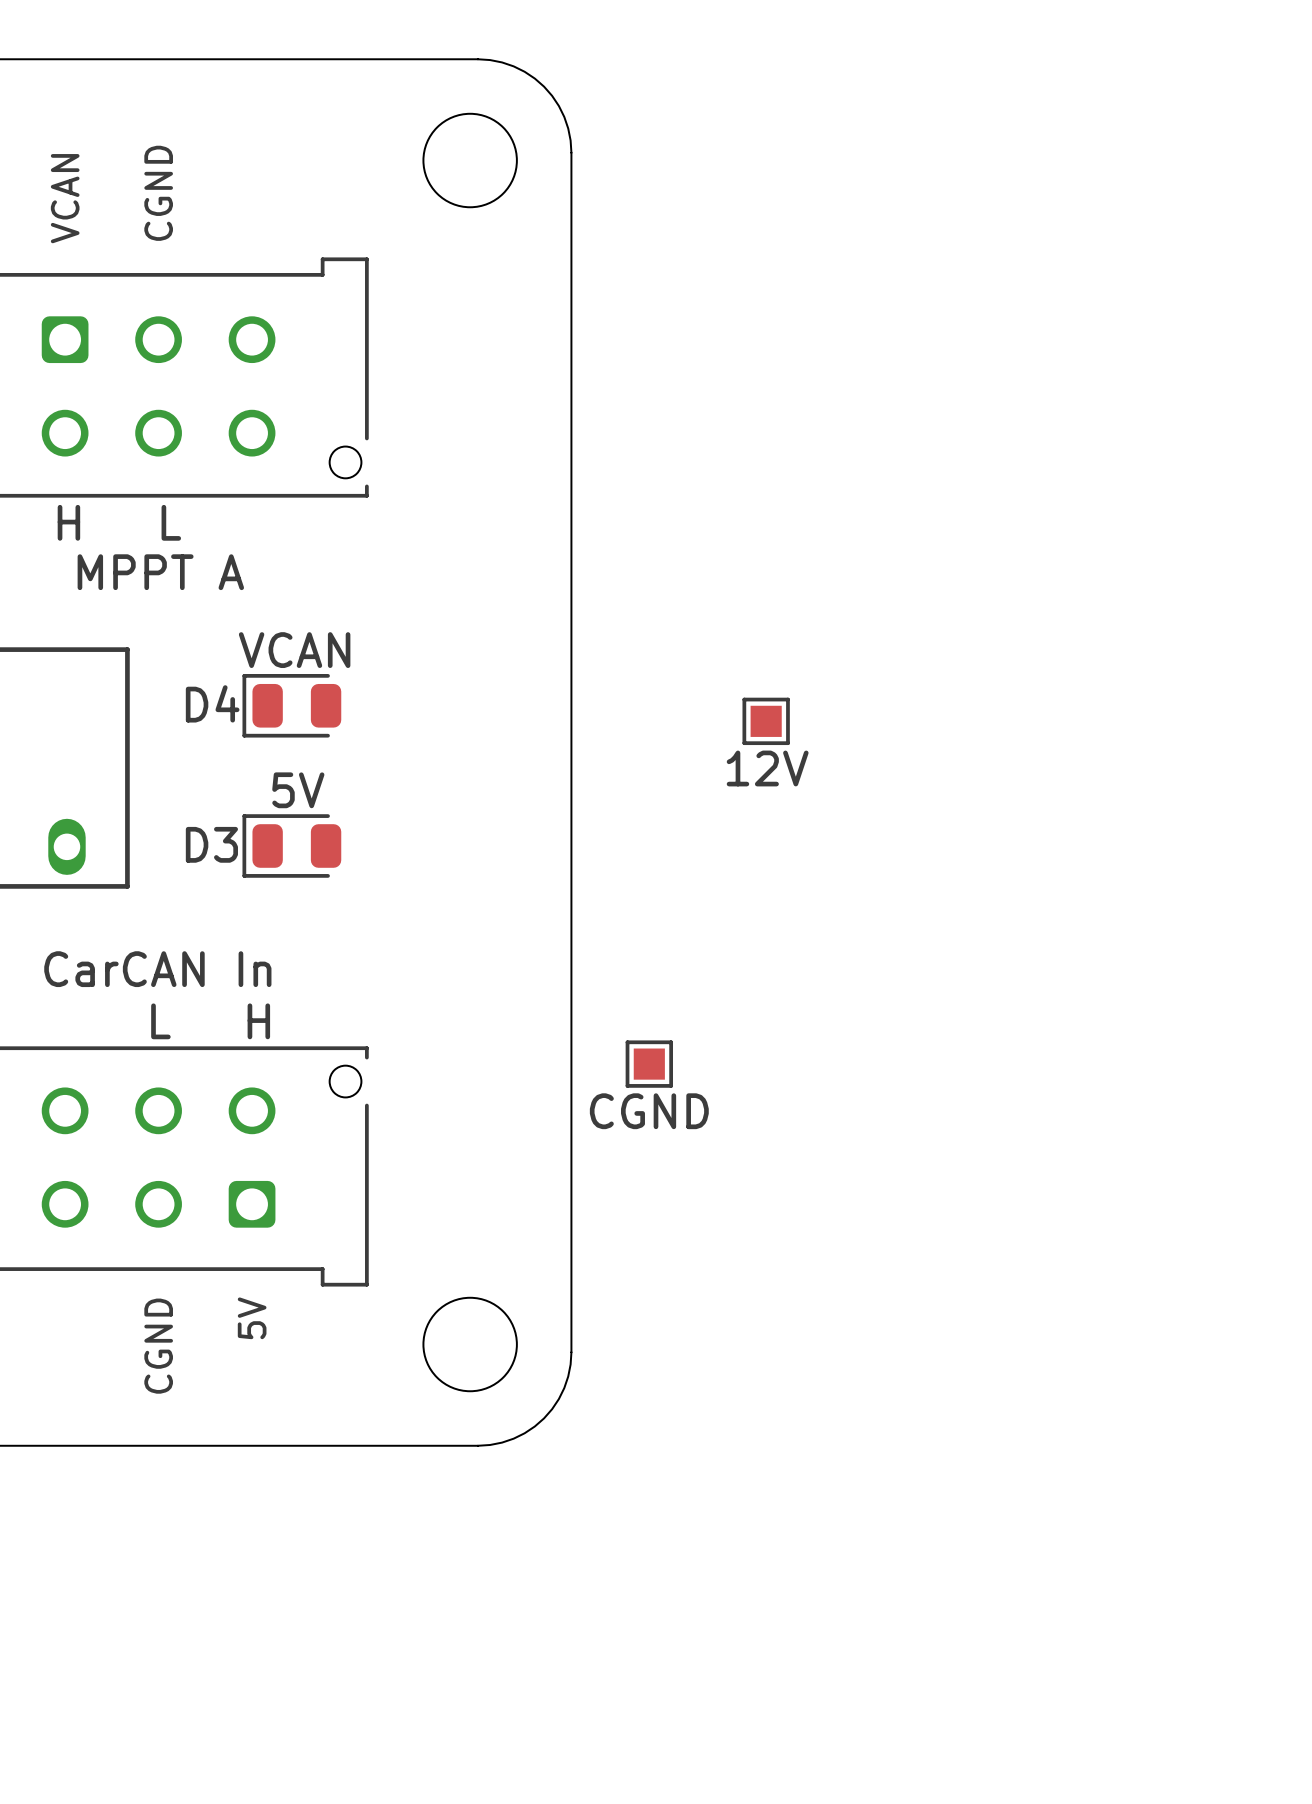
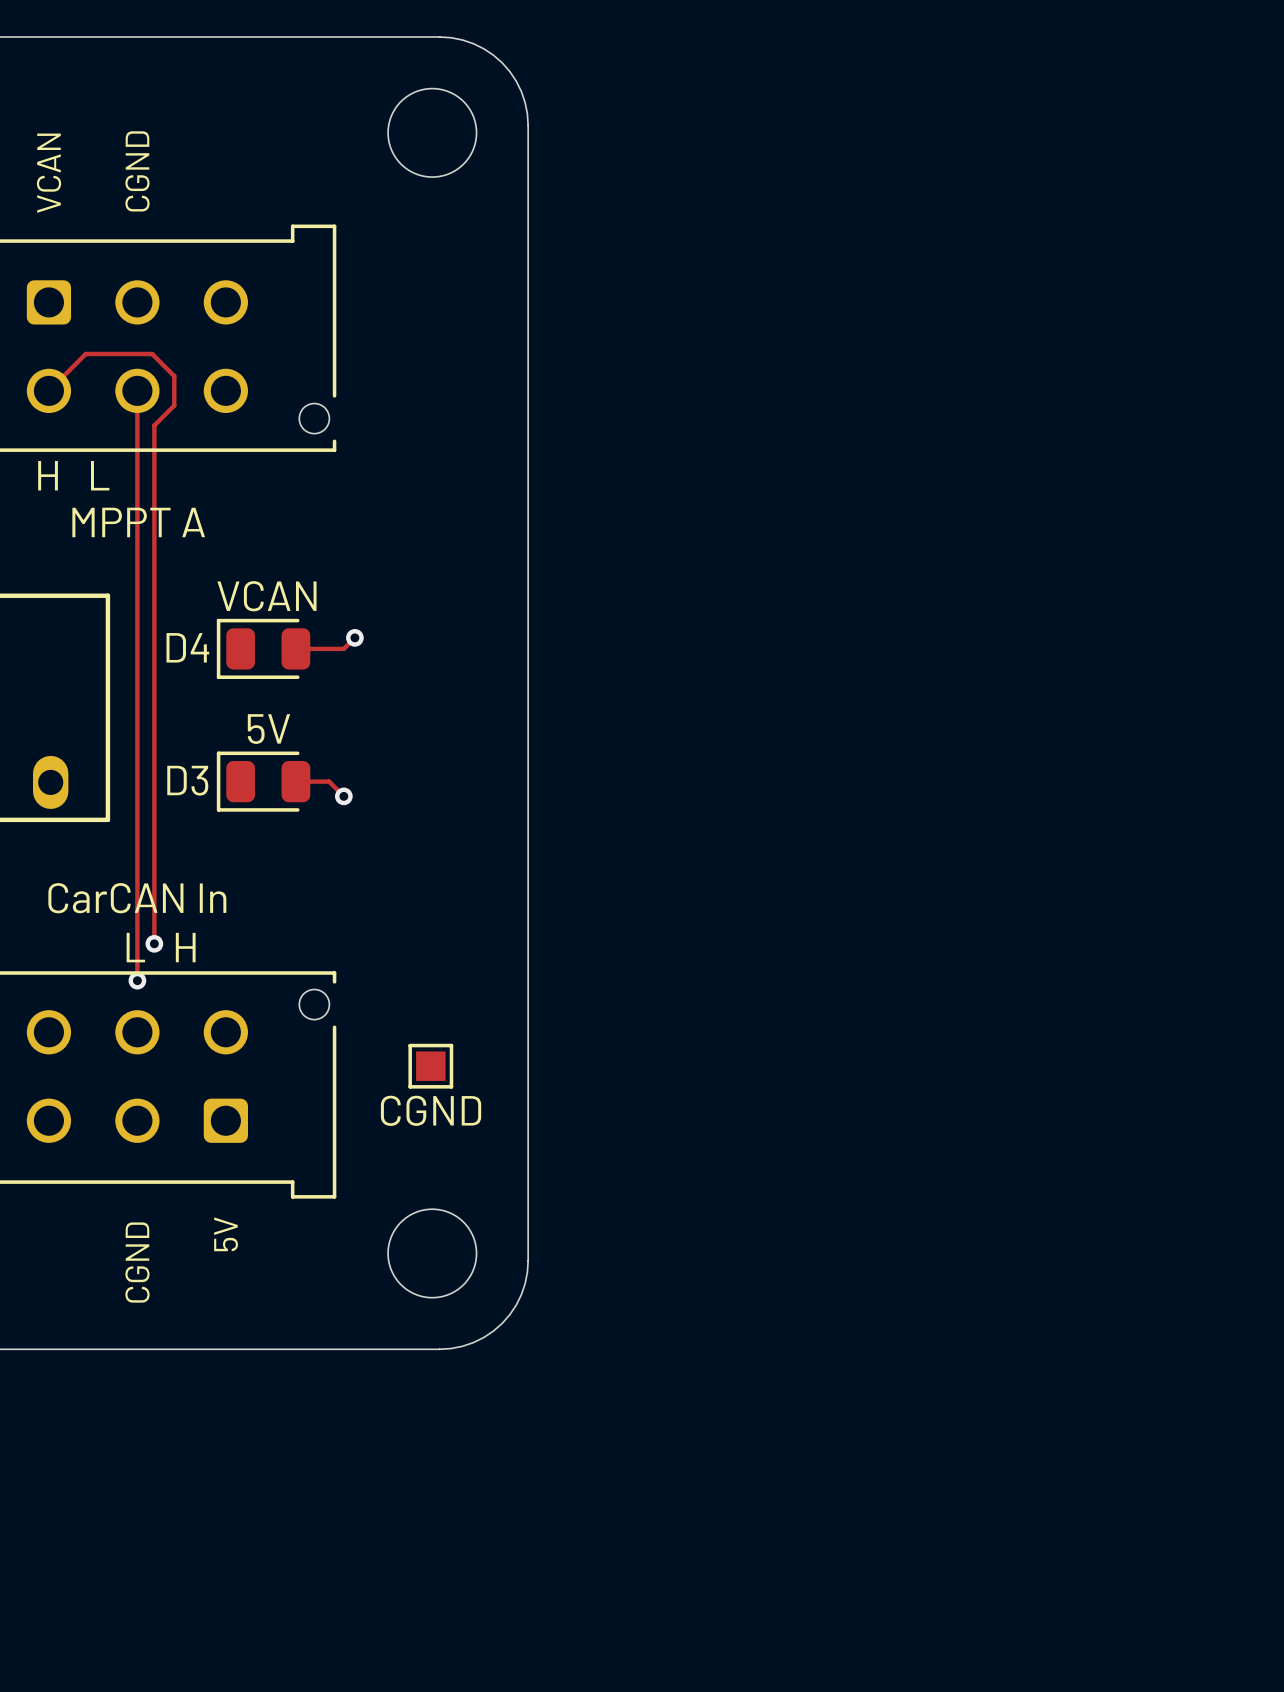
track: none -> (48, 390) (85, 354) (152, 354) (174, 376) (174, 405) (154, 425) (154, 943)
track: none -> (137, 390) (137, 980)
track: none -> (354, 637) (343, 648) (295, 648)
via: none -> (354, 637)
part: 12V (766, 721) -> none
track: none -> (295, 781) (329, 781) (343, 796)
via: none -> (343, 796)
via: none -> (154, 943)
via: none -> (137, 980)
part position: (649, 1064) -> (430, 1066)

